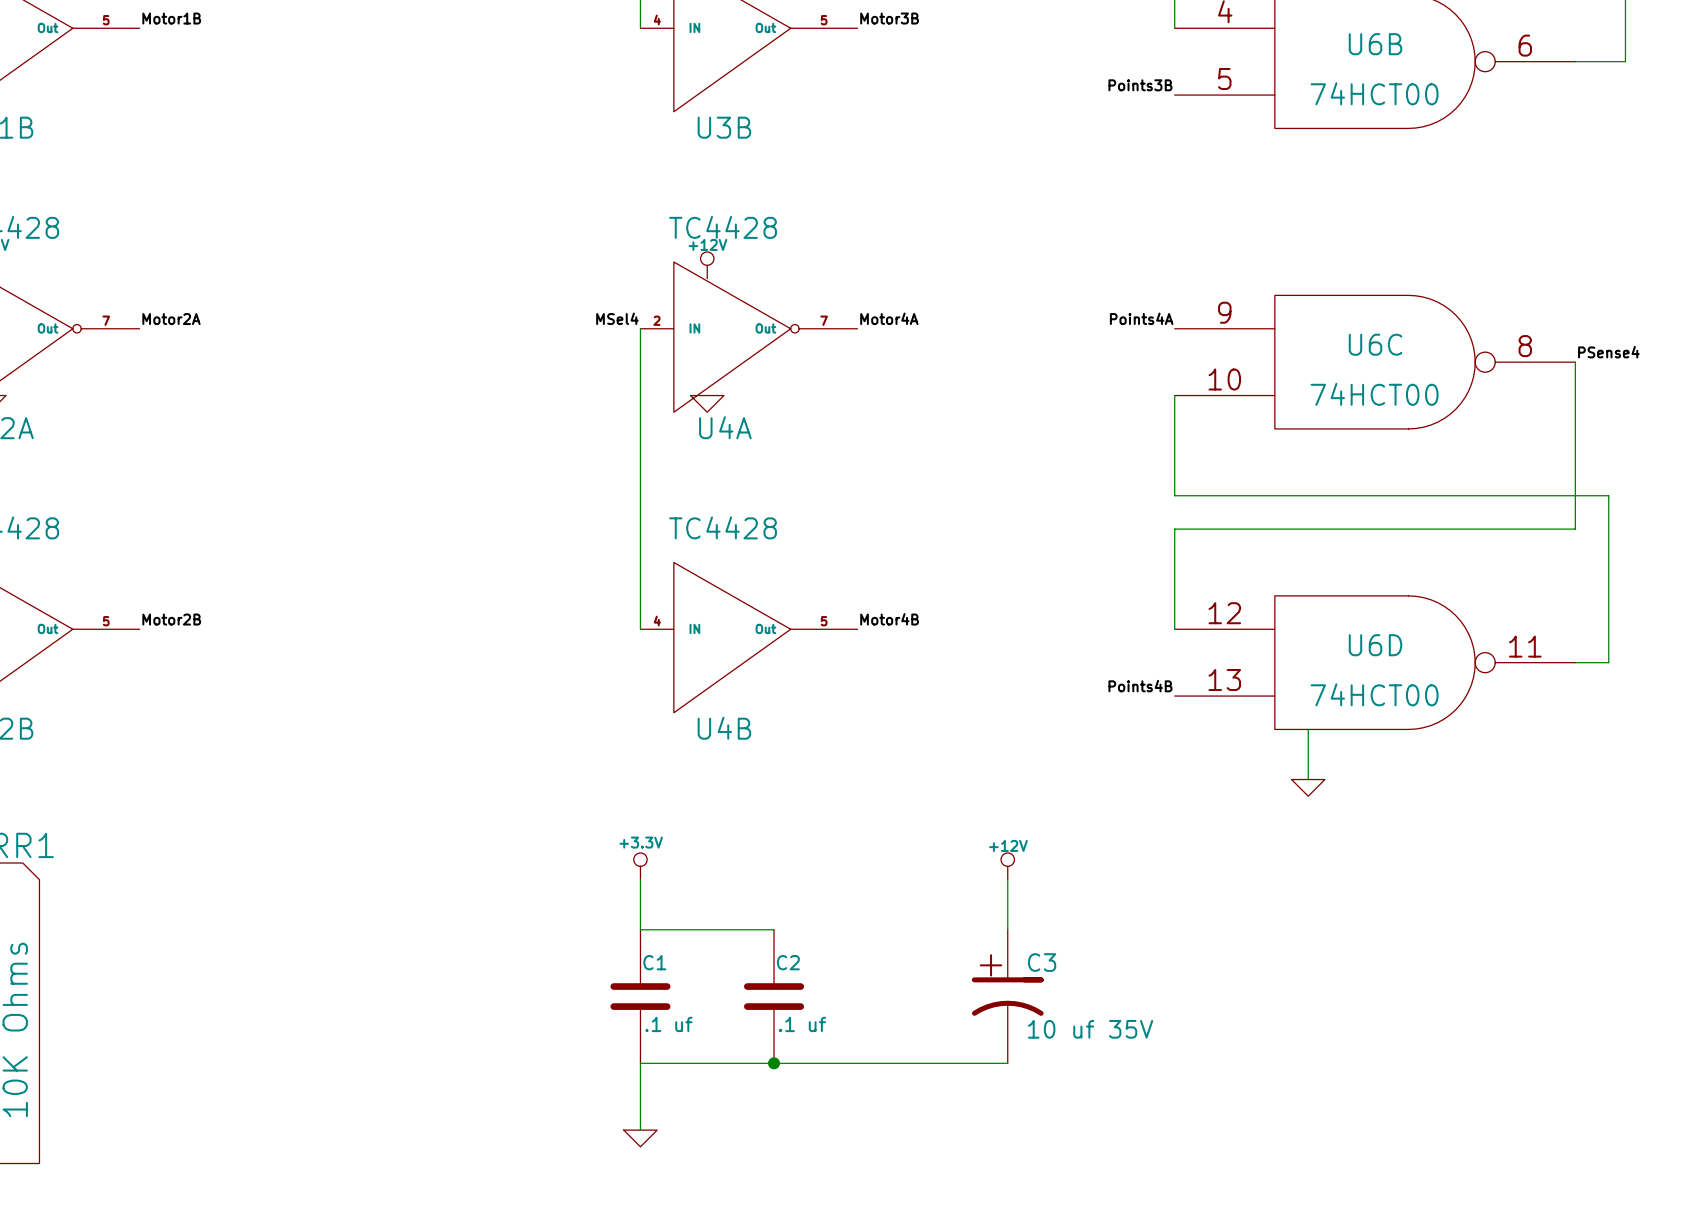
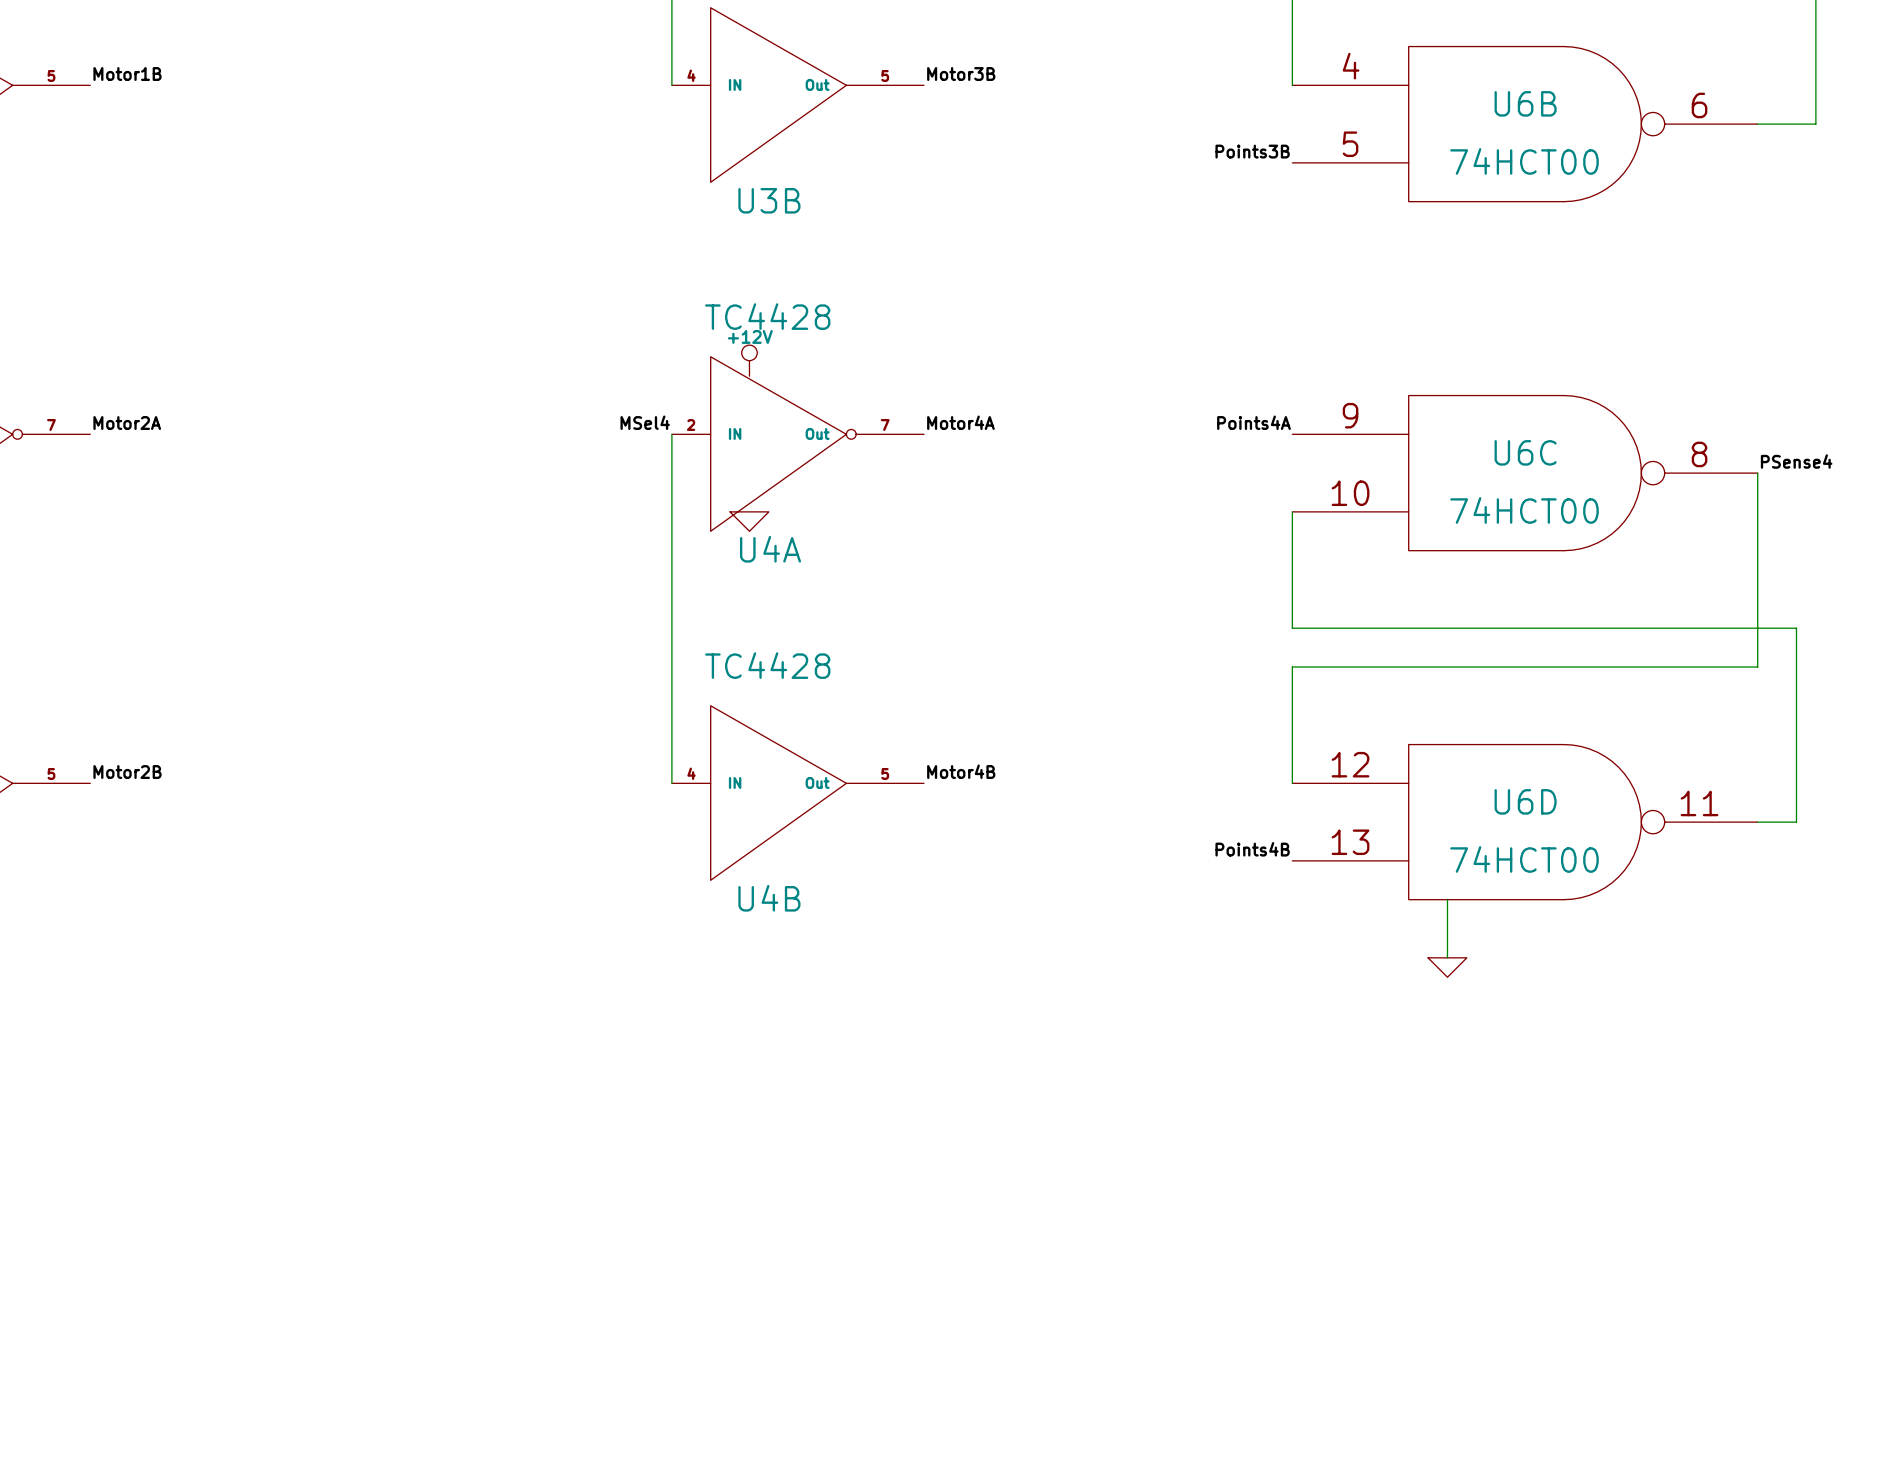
power symbol: +3.3V (640, 866) -> none
power symbol: +12V (1007, 866) -> none
wire: (640, 879) (640, 929) (774, 929) -> none
wire: (1007, 879) (1007, 929) -> none
C1: .1 uf (640, 996) -> none
C2: .1 uf (774, 996) -> none
C3: 10 uf 35V (1007, 996) -> none
junction: (774, 1063) -> none
wire: (1007, 1063) (640, 1063) (640, 1130) -> none
power symbol: (640, 1138) -> none

